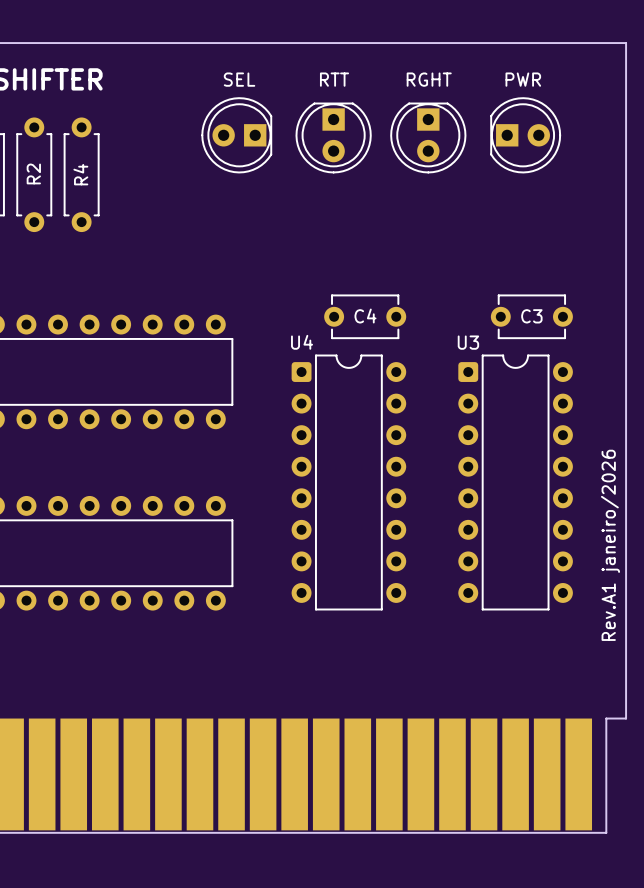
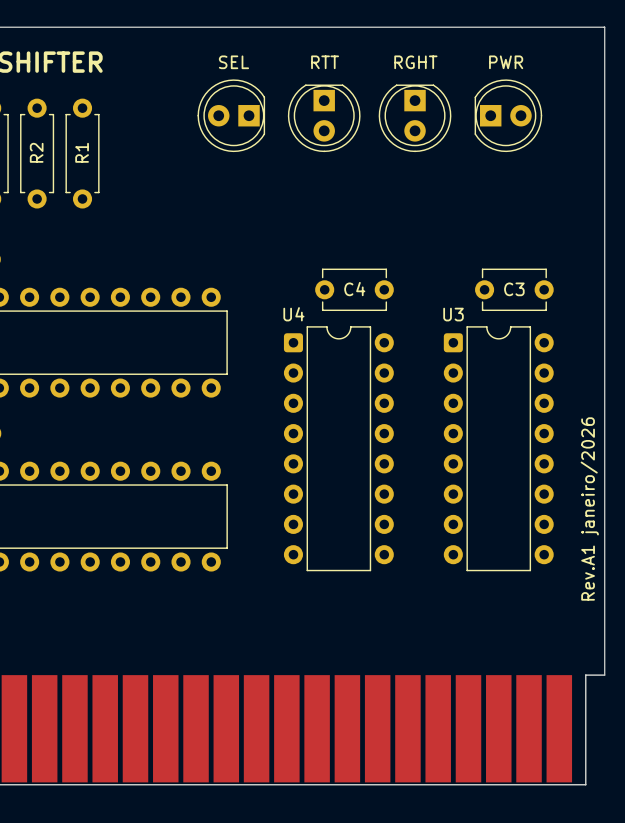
R4 name: R4 (80, 174) -> R1 (82, 152)

